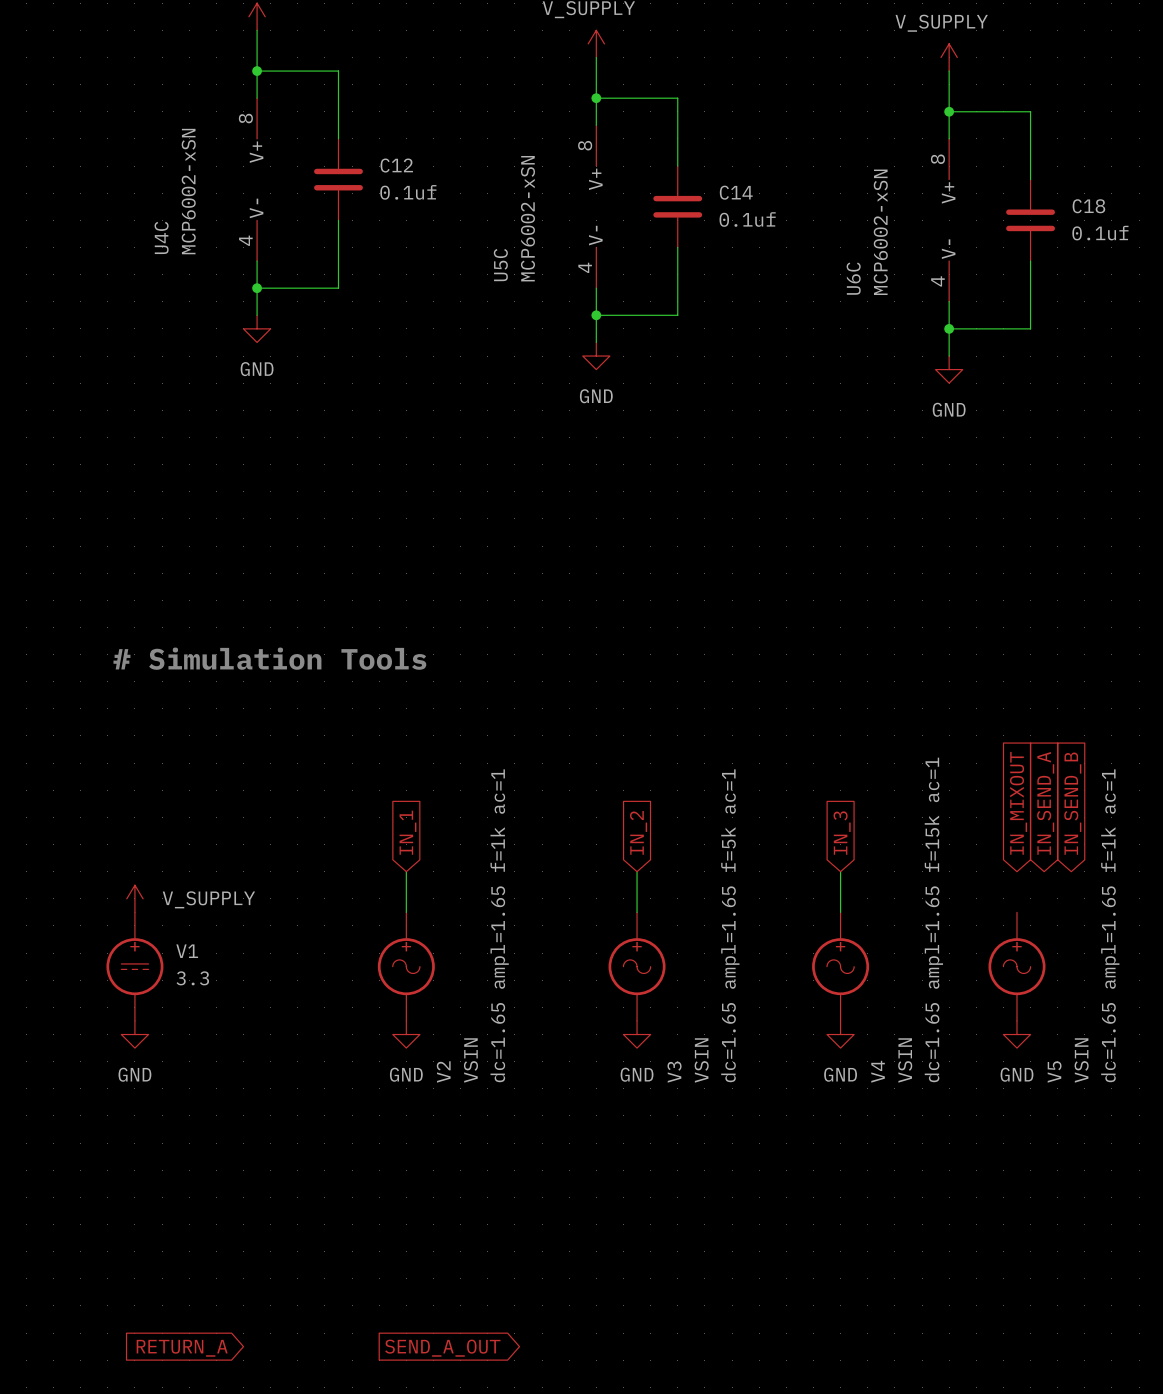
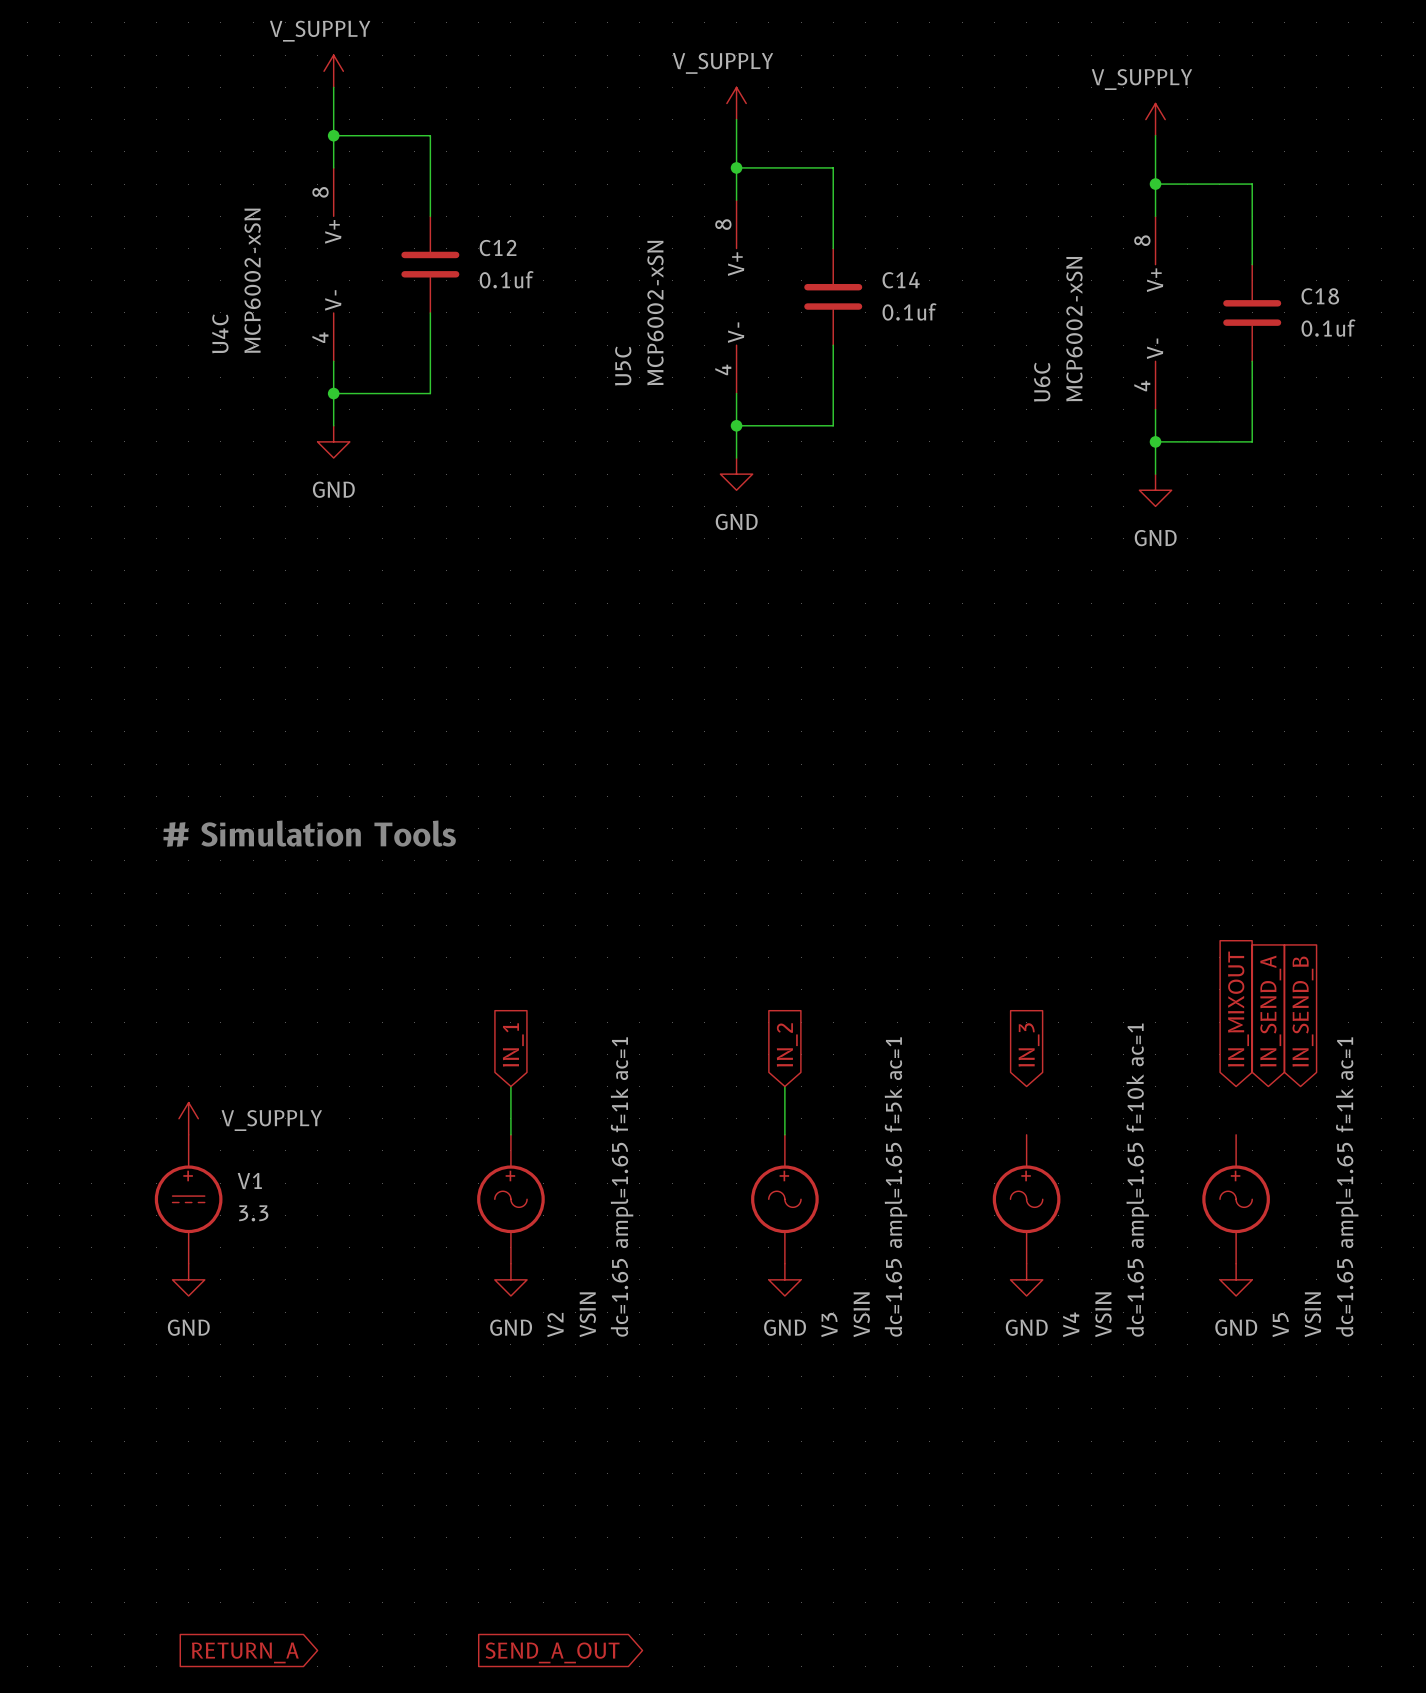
wire: (840, 871) (840, 912) -> none
V4 text: dc=1.65 ampl=1.65 f=15k ac=1 (933, 919) -> dc=1.65 ampl=1.65 f=10k ac=1 (1137, 1180)

